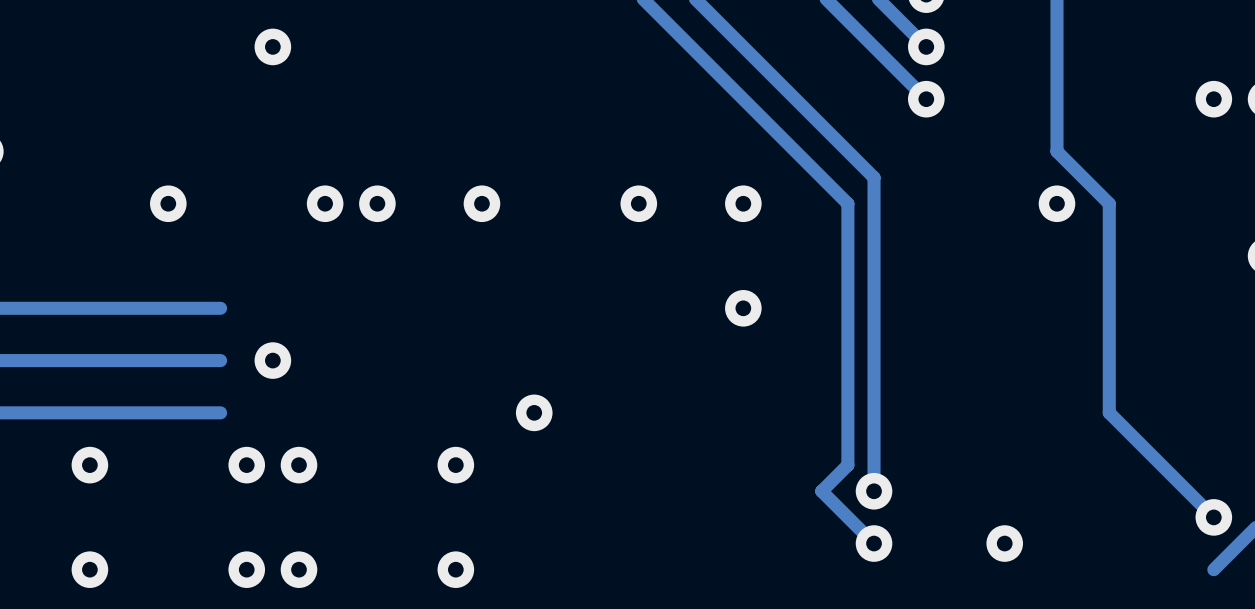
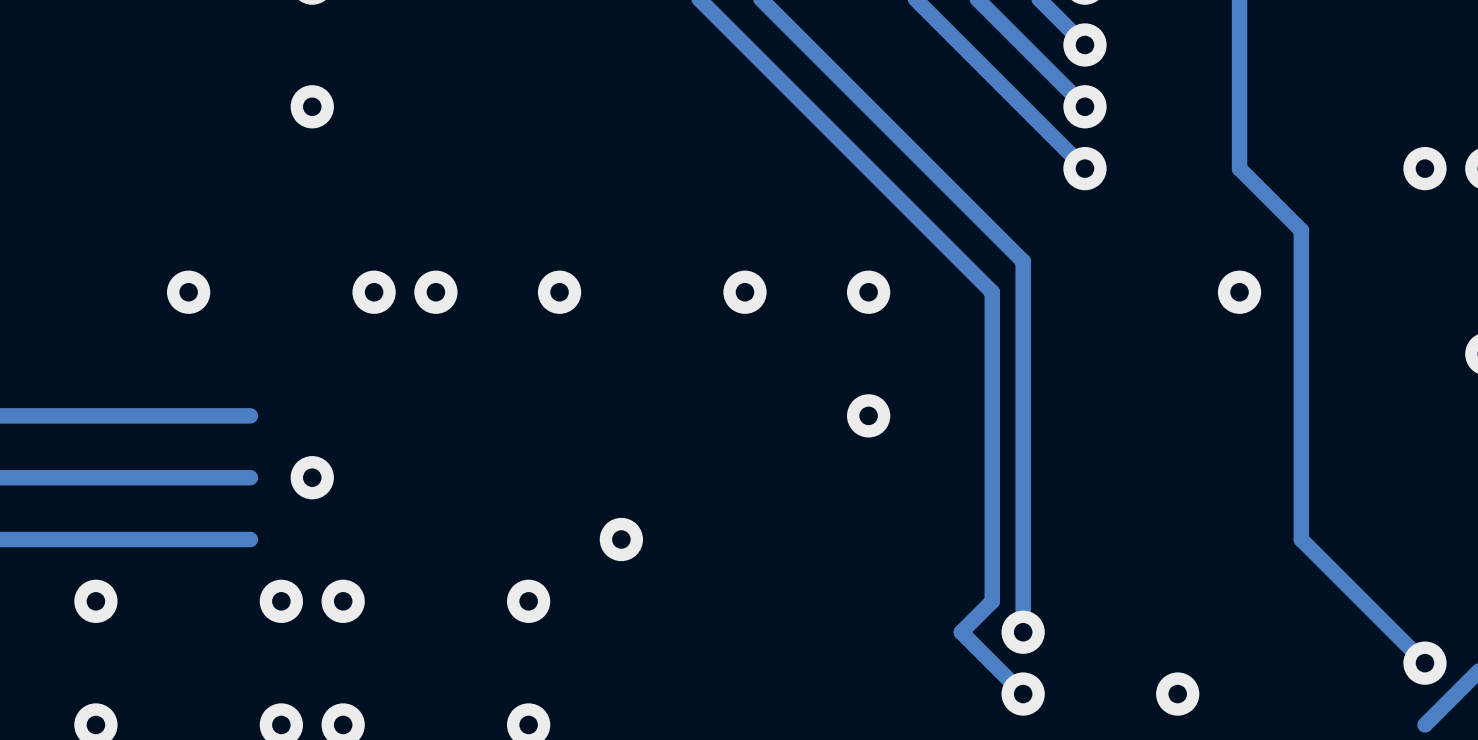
track: (1056, 99) (1056, 151) (1109, 203) -> (1239, 168) (1301, 230) (1301, 292)

